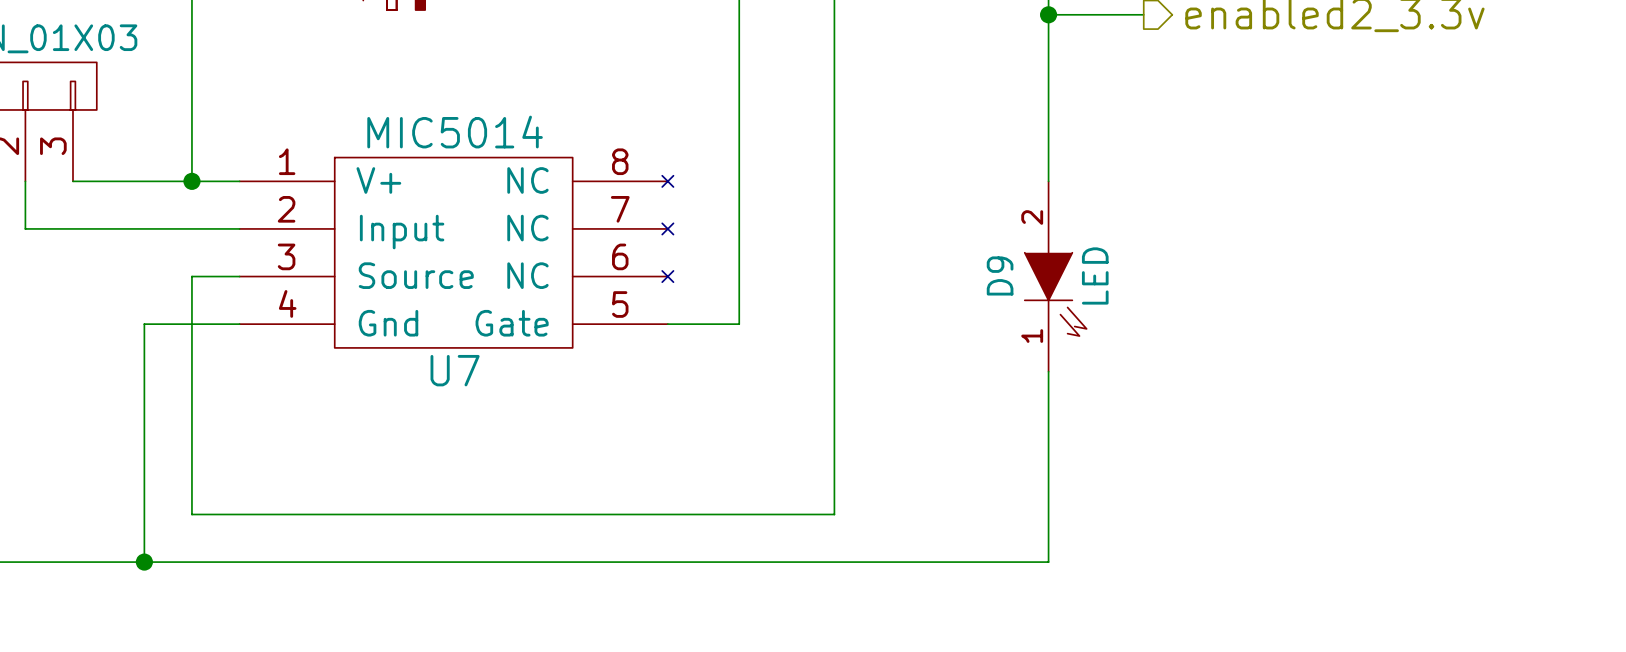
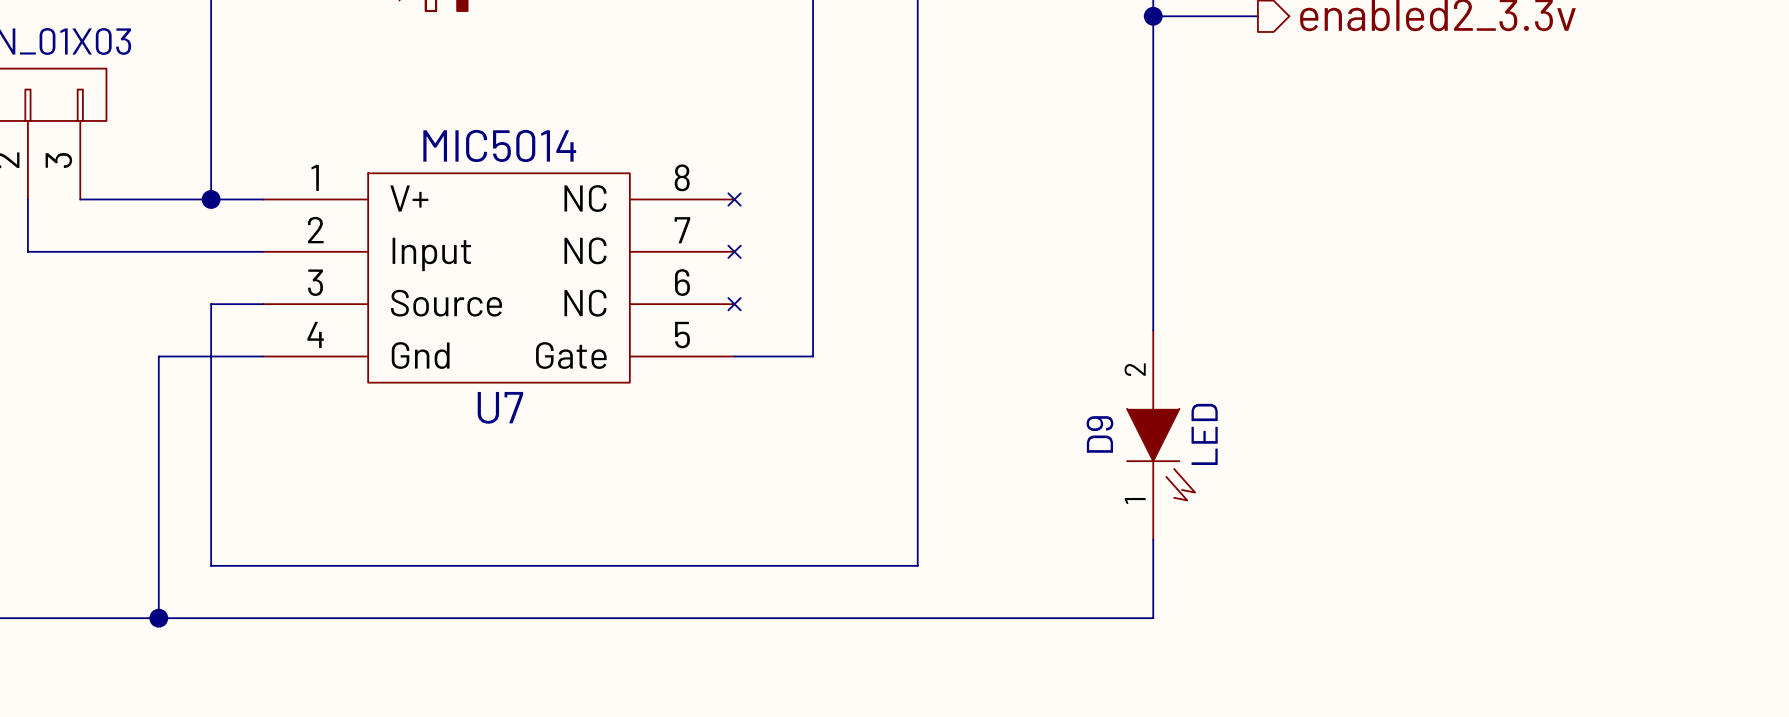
D9 position: (1055, 276) -> (1161, 435)

